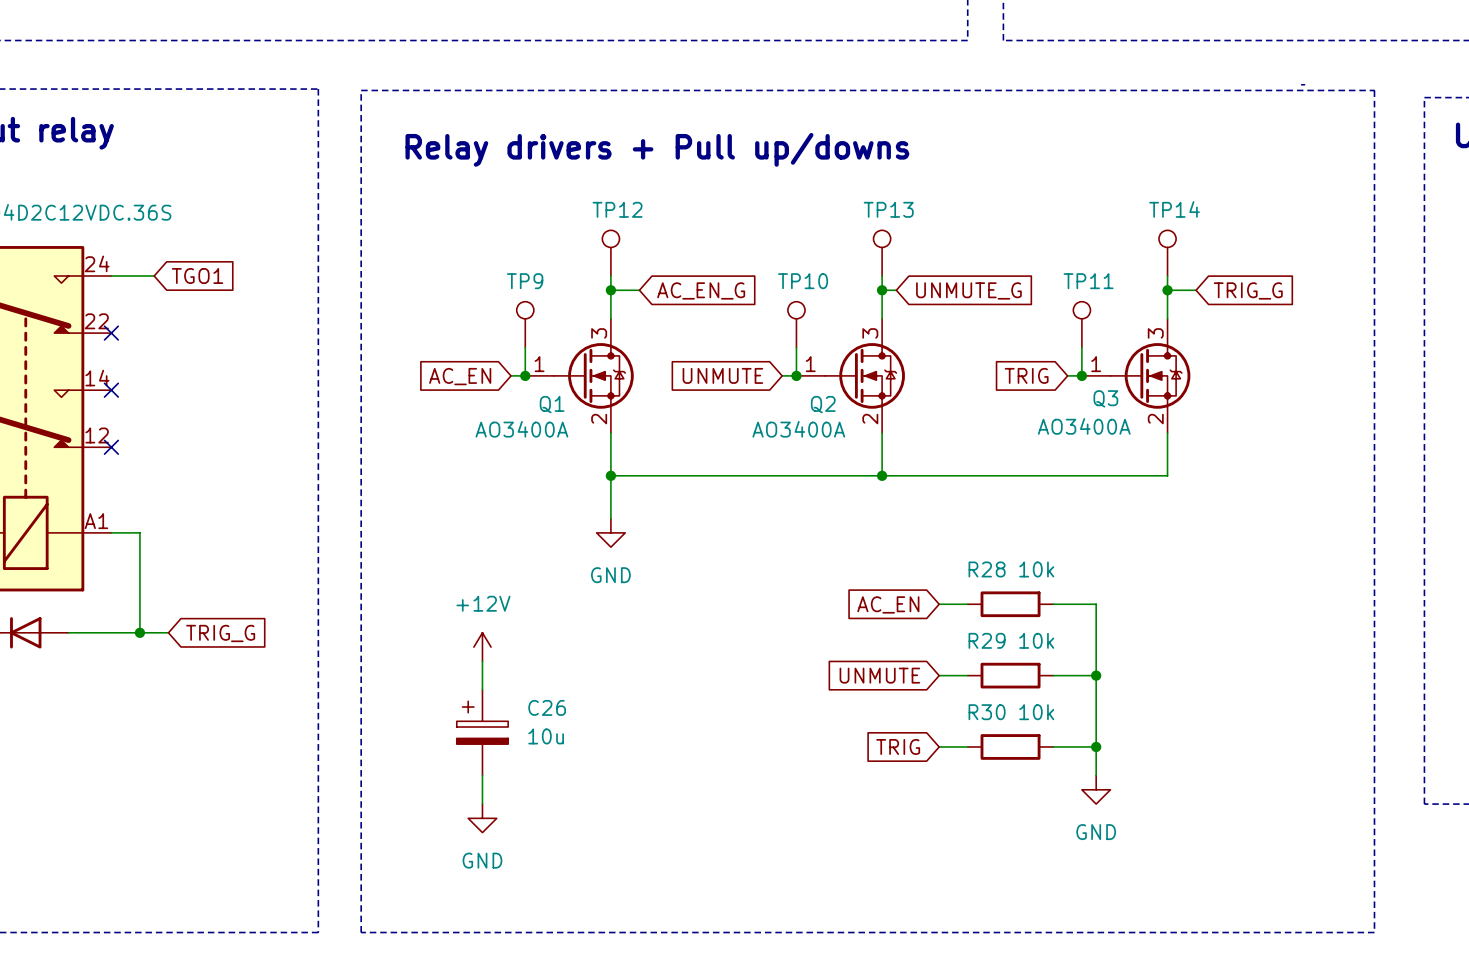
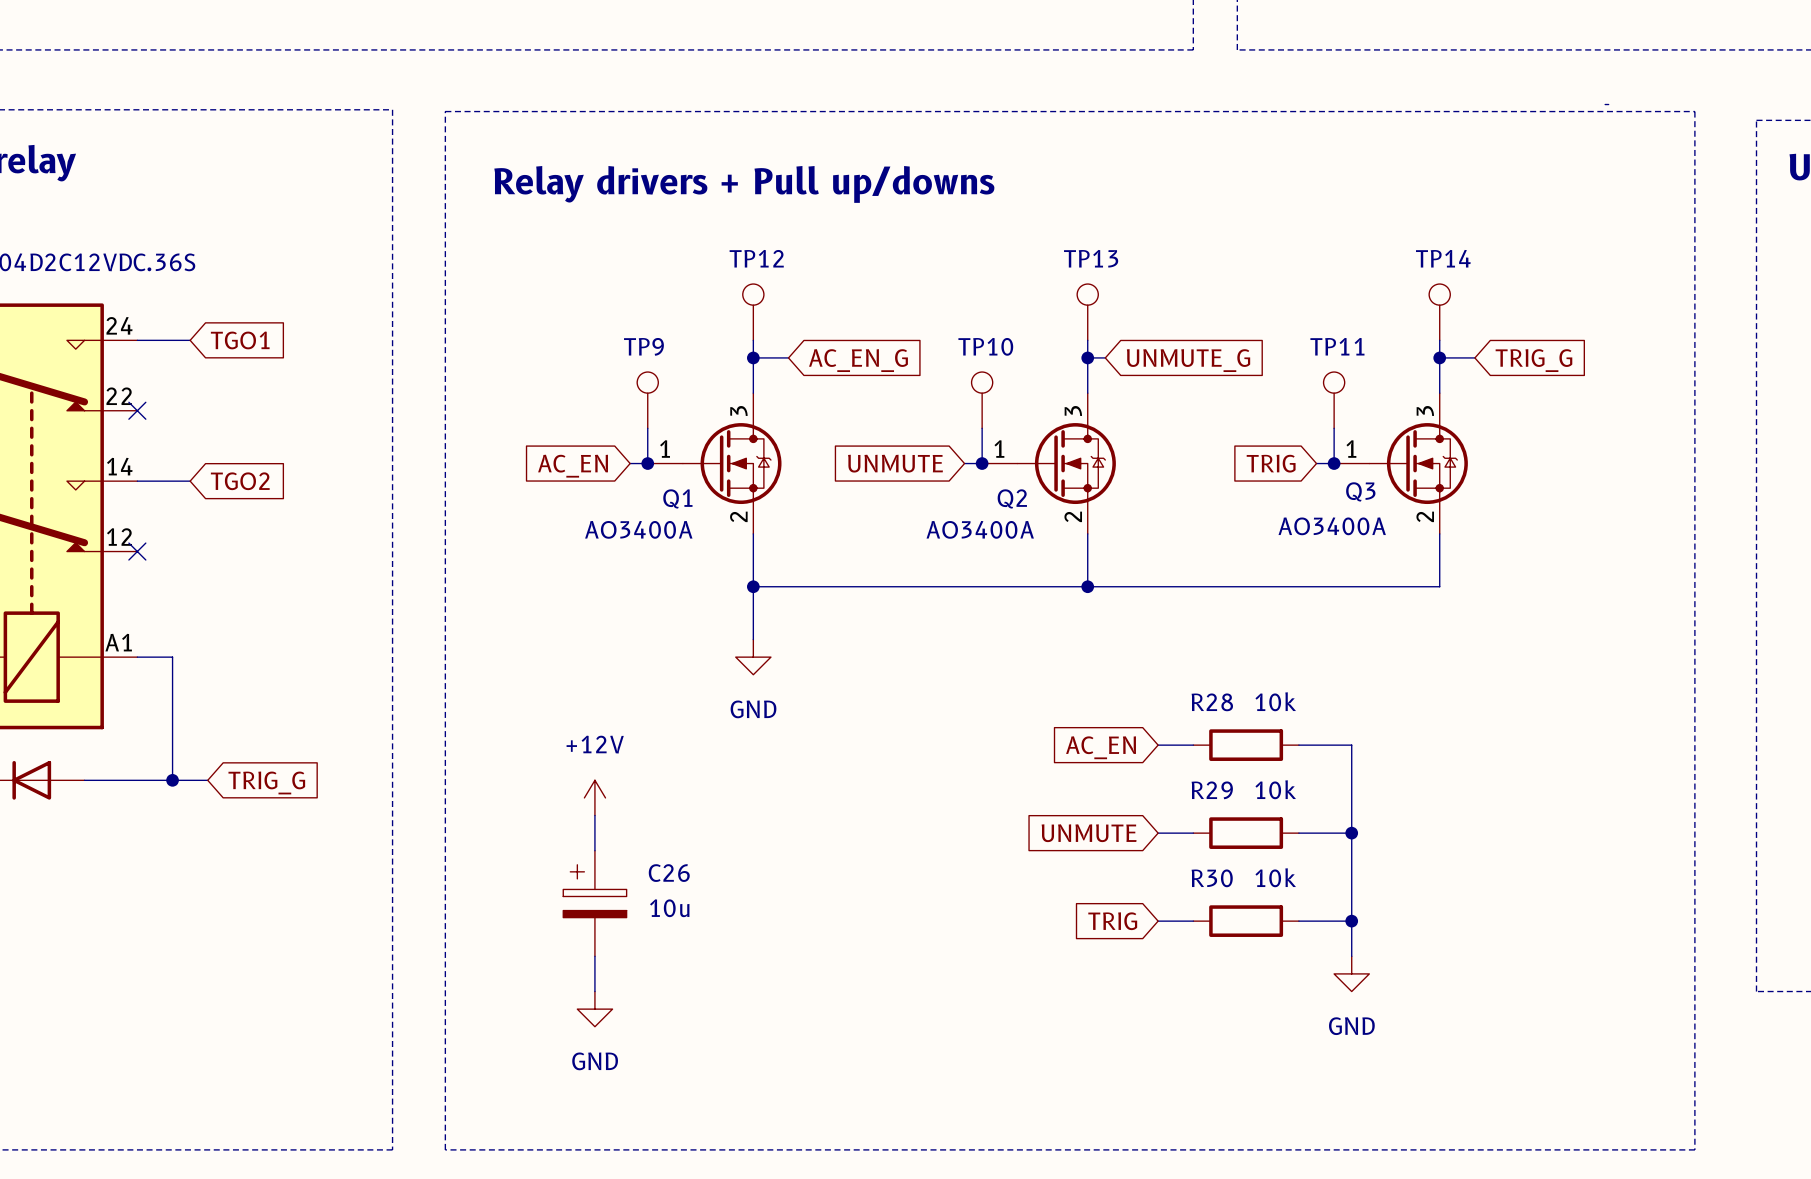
wire: none -> (137, 481) (190, 481)
no-connect mark: (111, 390) -> none
global label: none -> TGO2 (240, 481)

